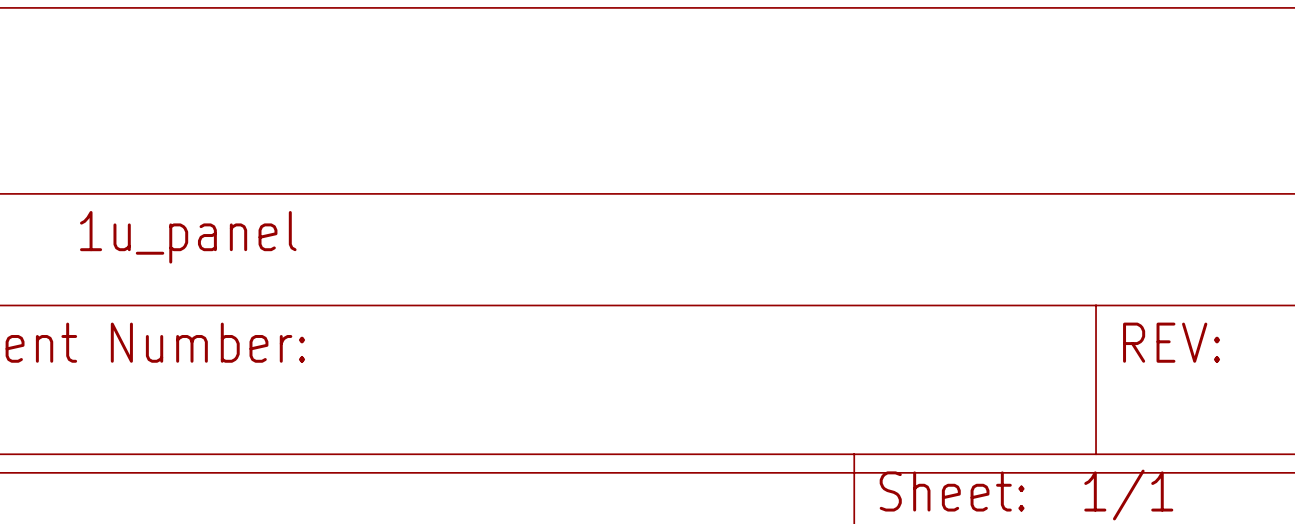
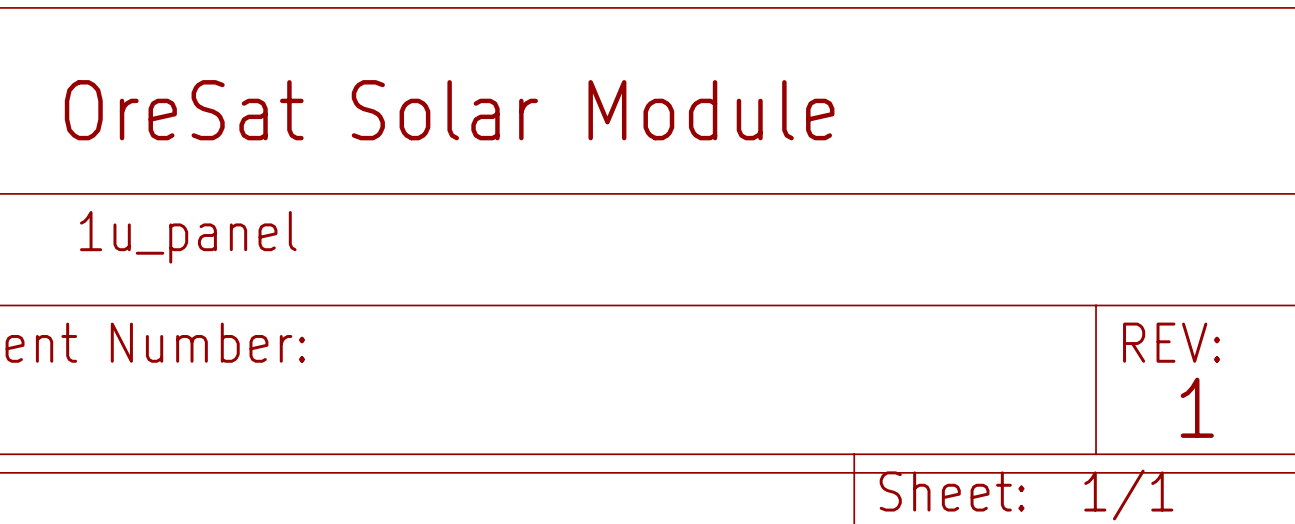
text: none -> OreSat Solar Module (449, 110)
text: none -> 1 (1197, 407)

